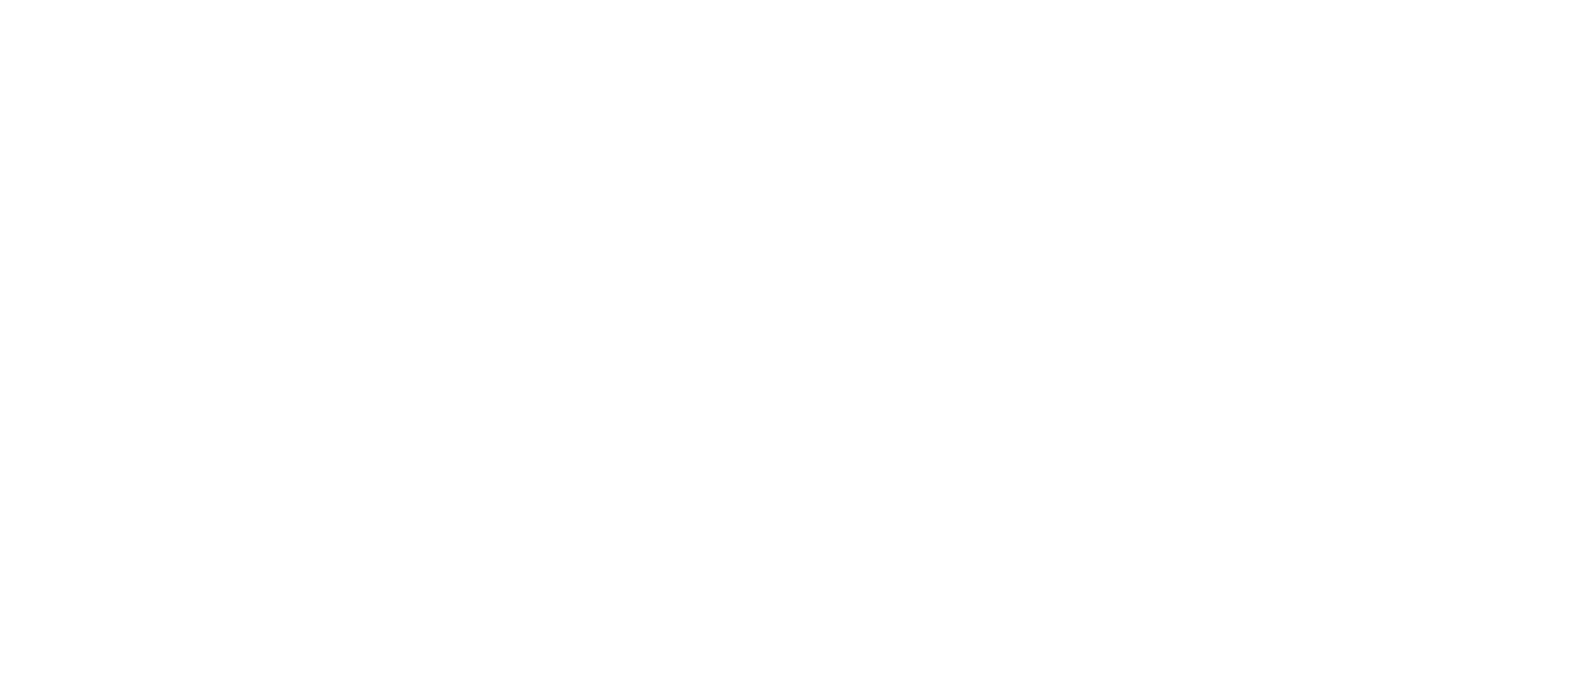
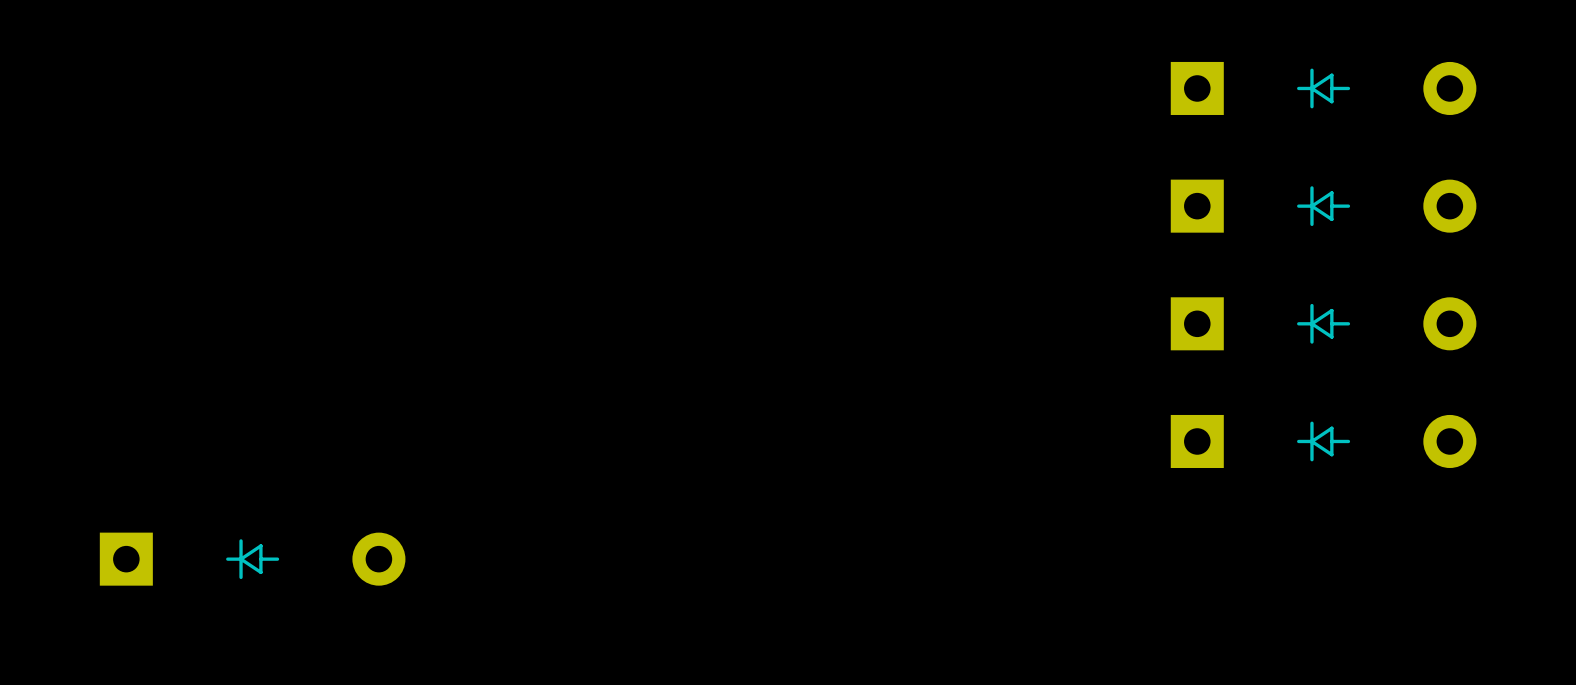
part: none -> (1323, 88)
part: none -> (1323, 206)
part: none -> (1323, 323)
part: none -> (1323, 441)
part: none -> (252, 559)

